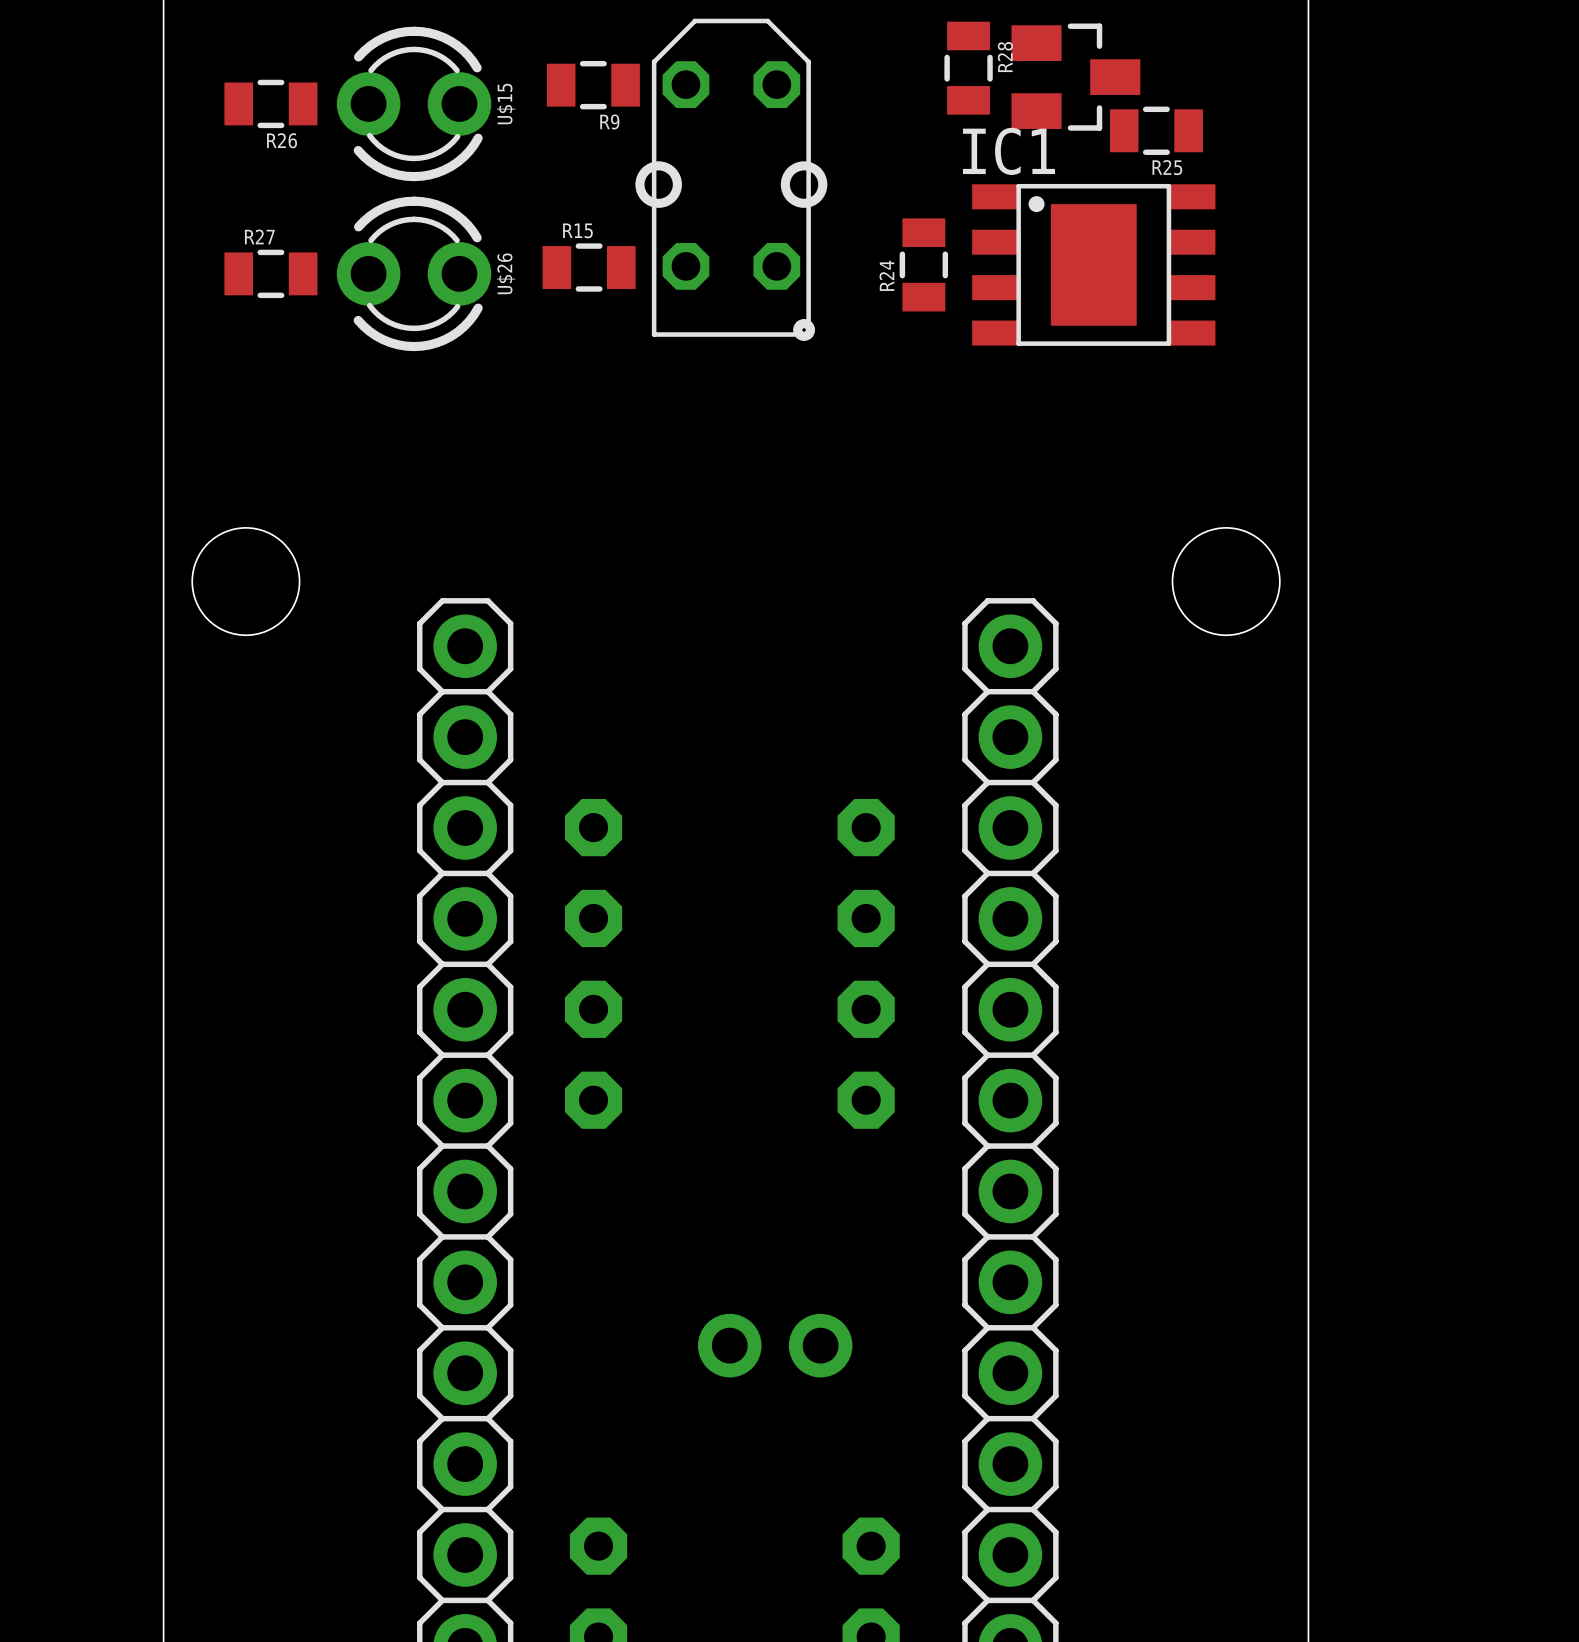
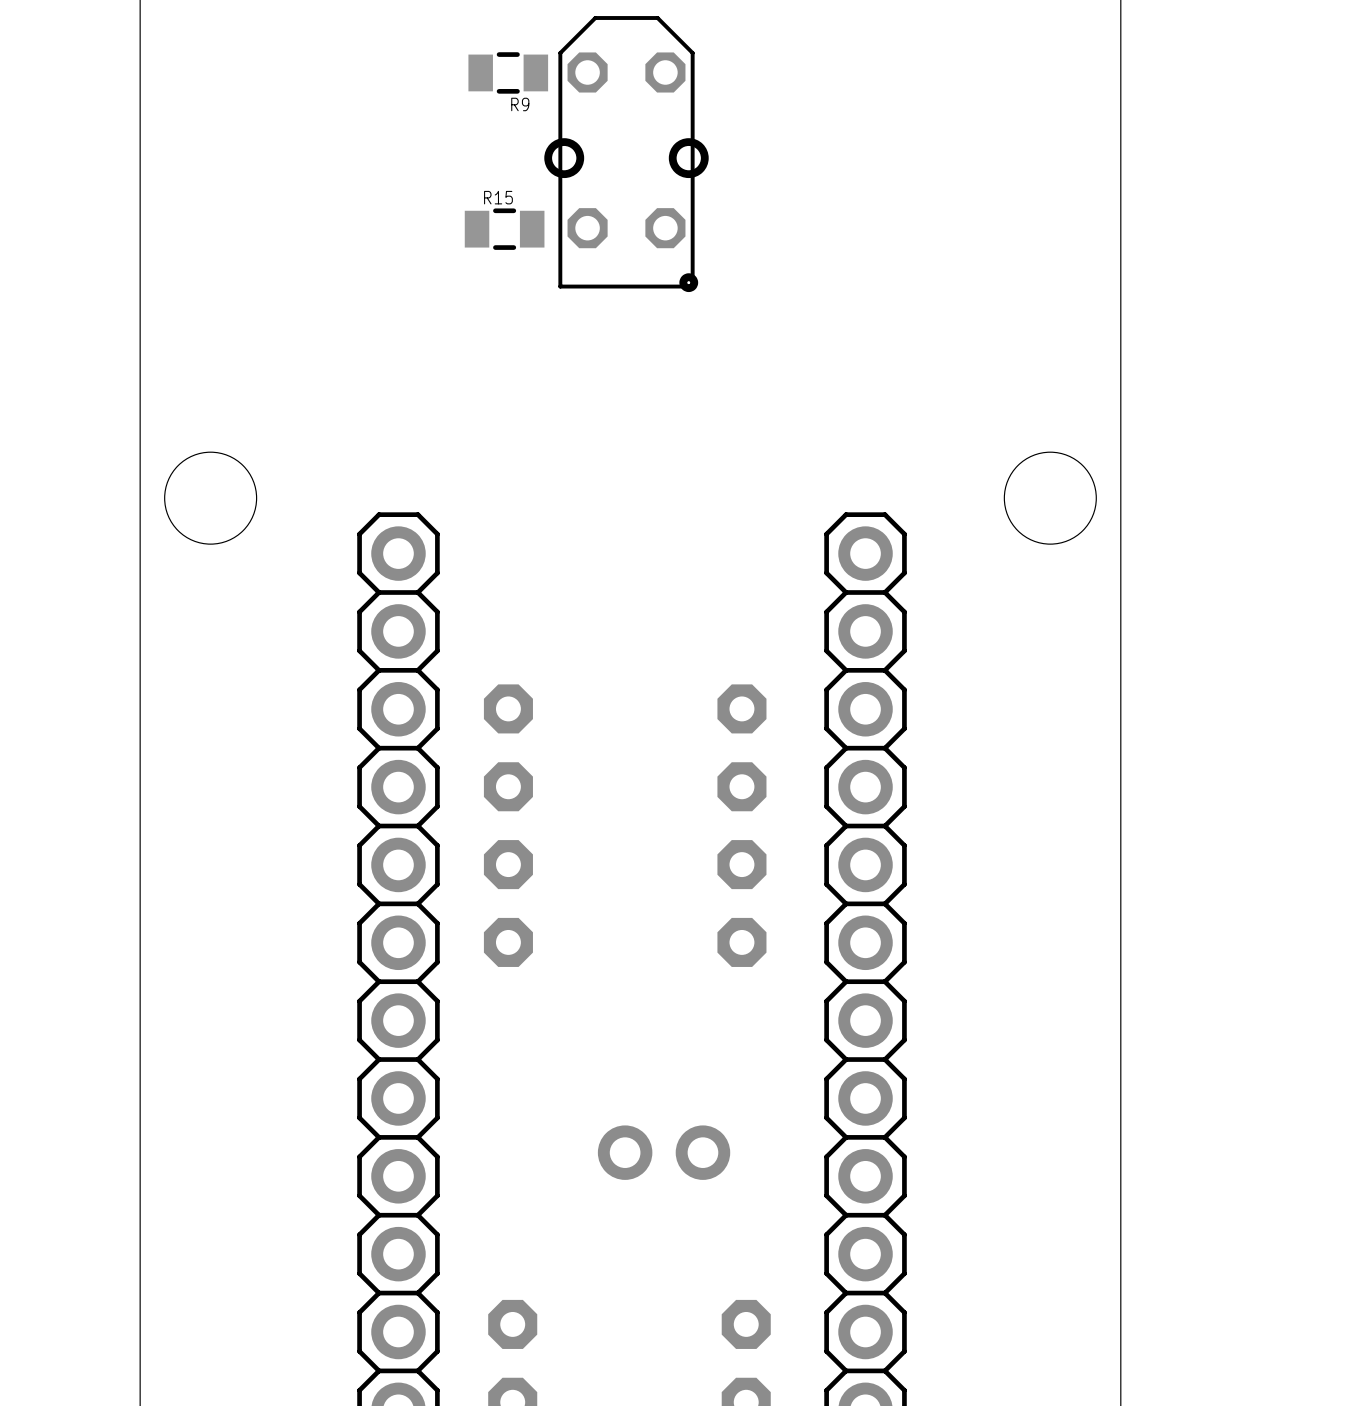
R28: (968, 68) -> none
part: (1075, 77) -> none
R26: (270, 103) -> none
U$15: (414, 103) -> none
R25: (1156, 130) -> none
R24: (923, 264) -> none
IC1: (1093, 264) -> none
R27: (270, 273) -> none
U$26: (414, 273) -> none

